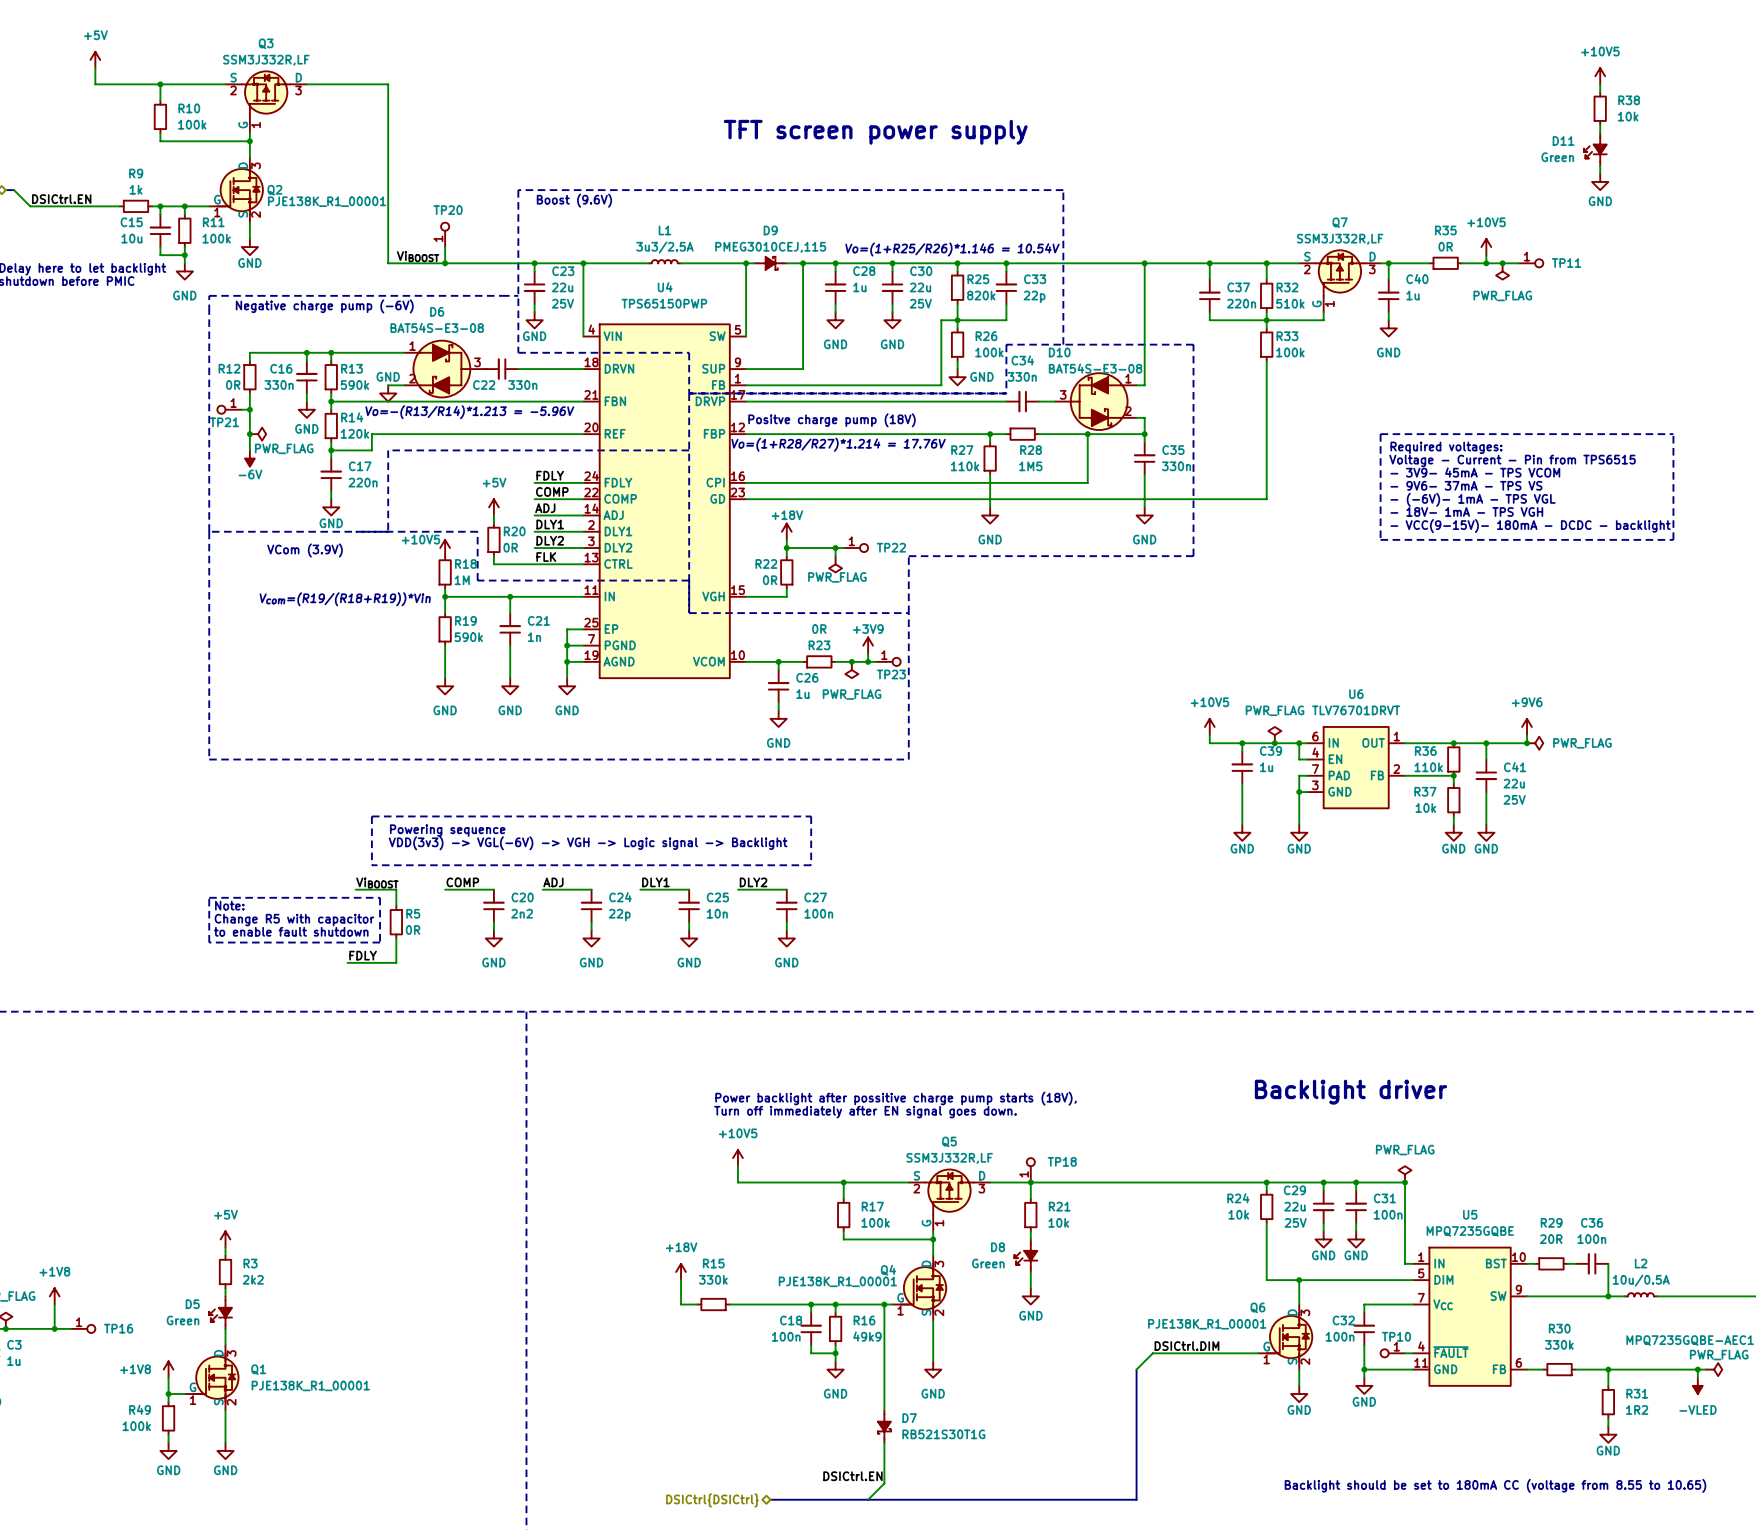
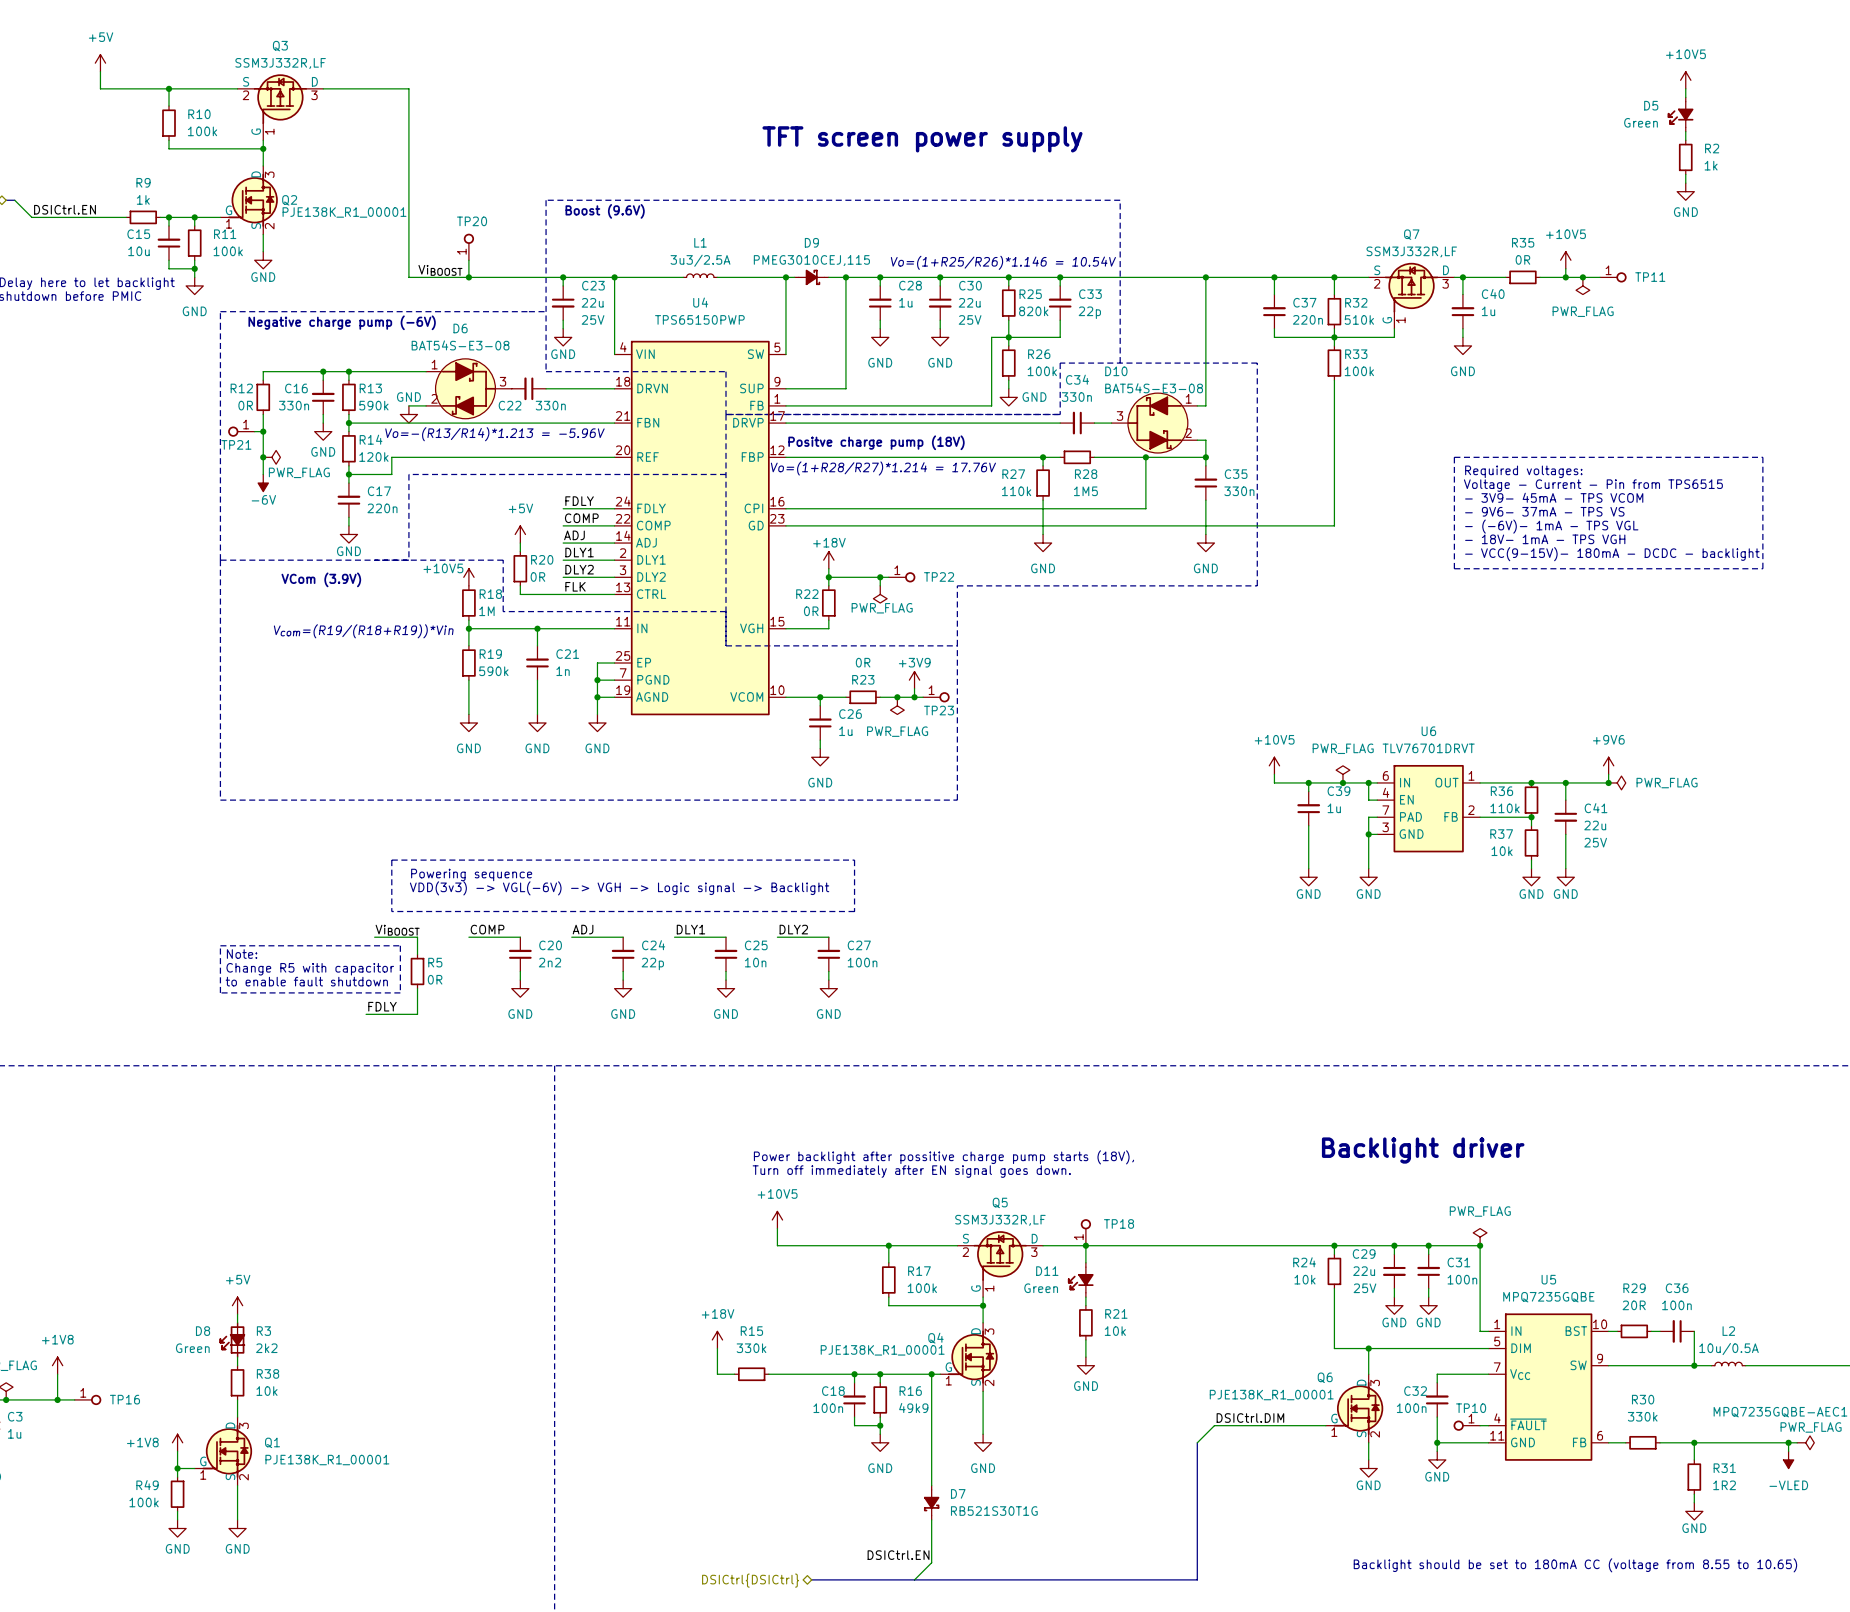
R38 position: (1600, 108) -> (237, 1382)
D11 position: (1595, 149) -> (1080, 1279)
R2: none -> (1685, 157)
R21 position: (1030, 1215) -> (1085, 1322)
D8 position: (1025, 1255) -> (232, 1339)
D5 position: (220, 1312) -> (1680, 114)

